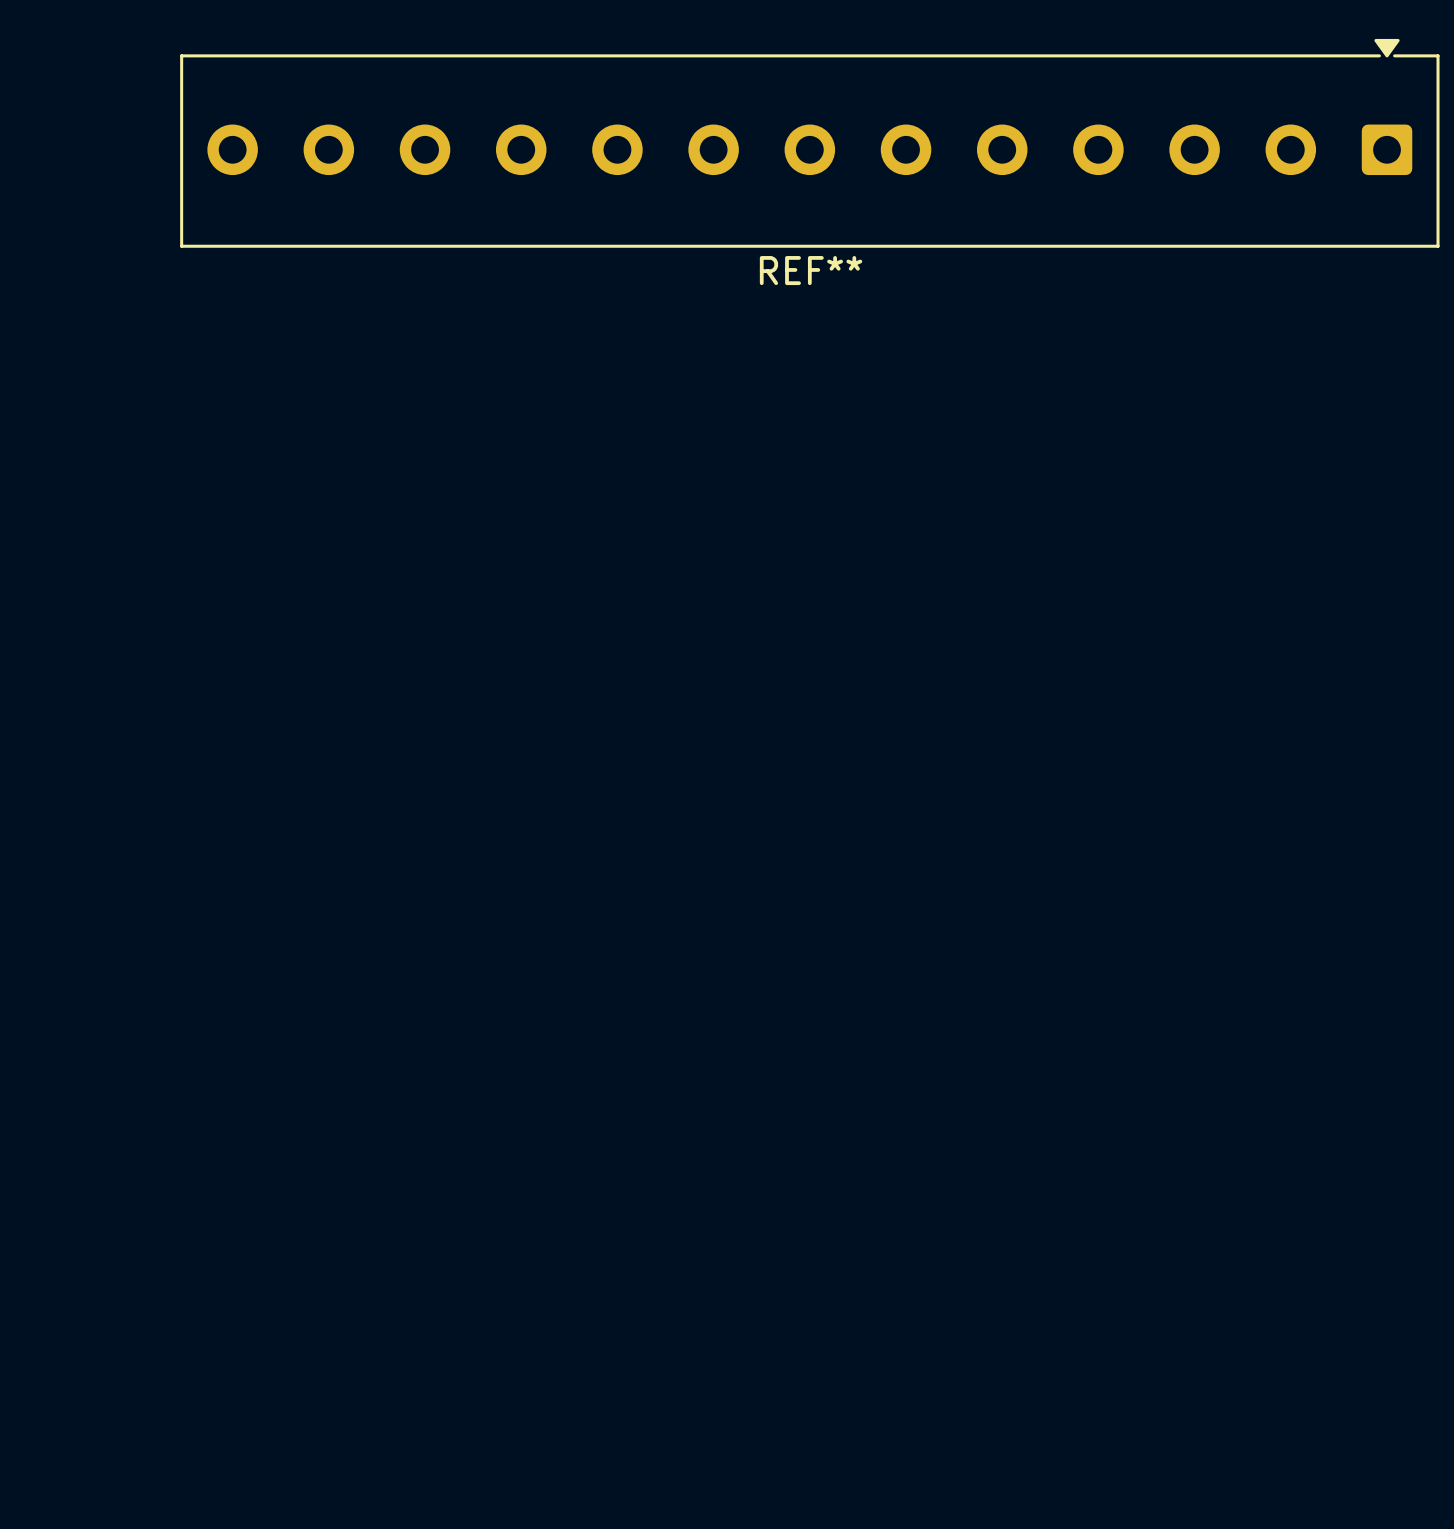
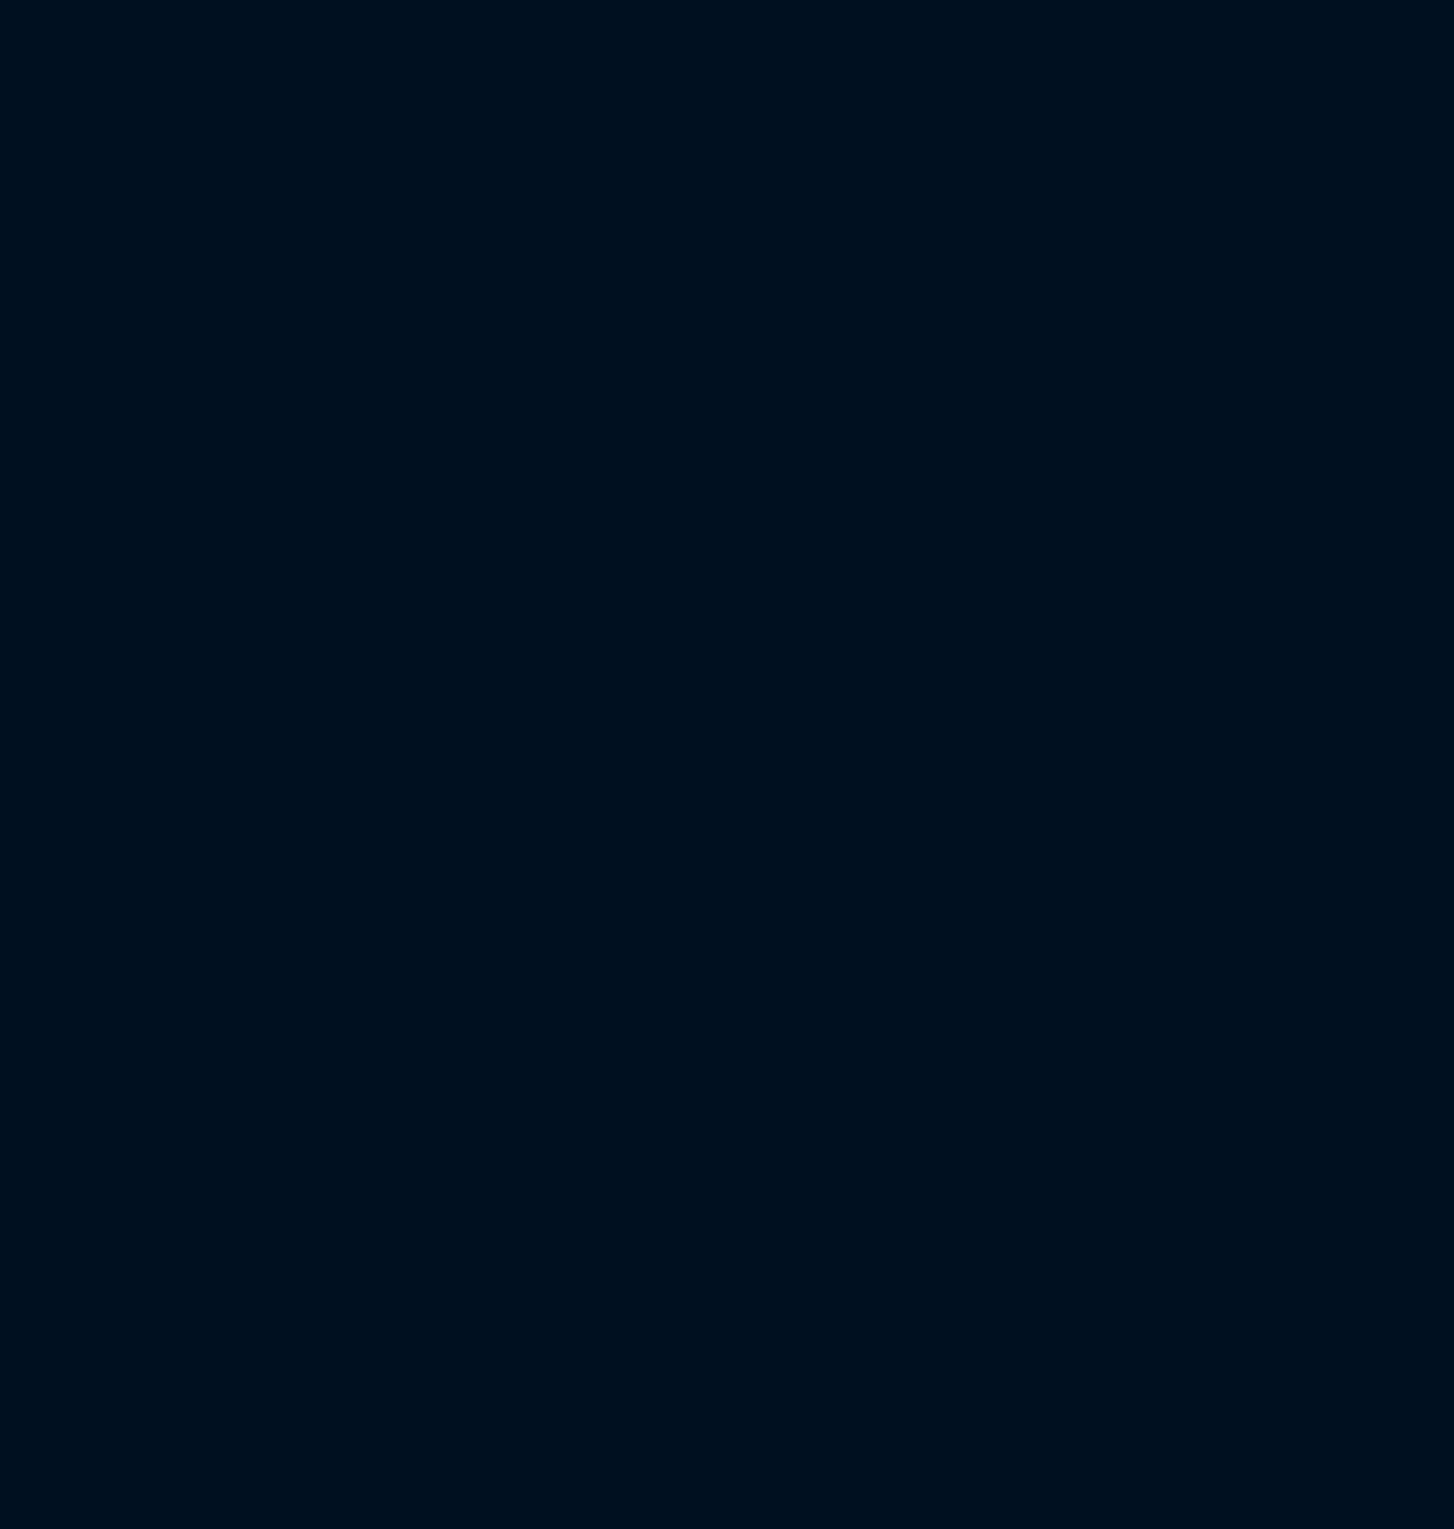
REF**: (809, 143) -> none

